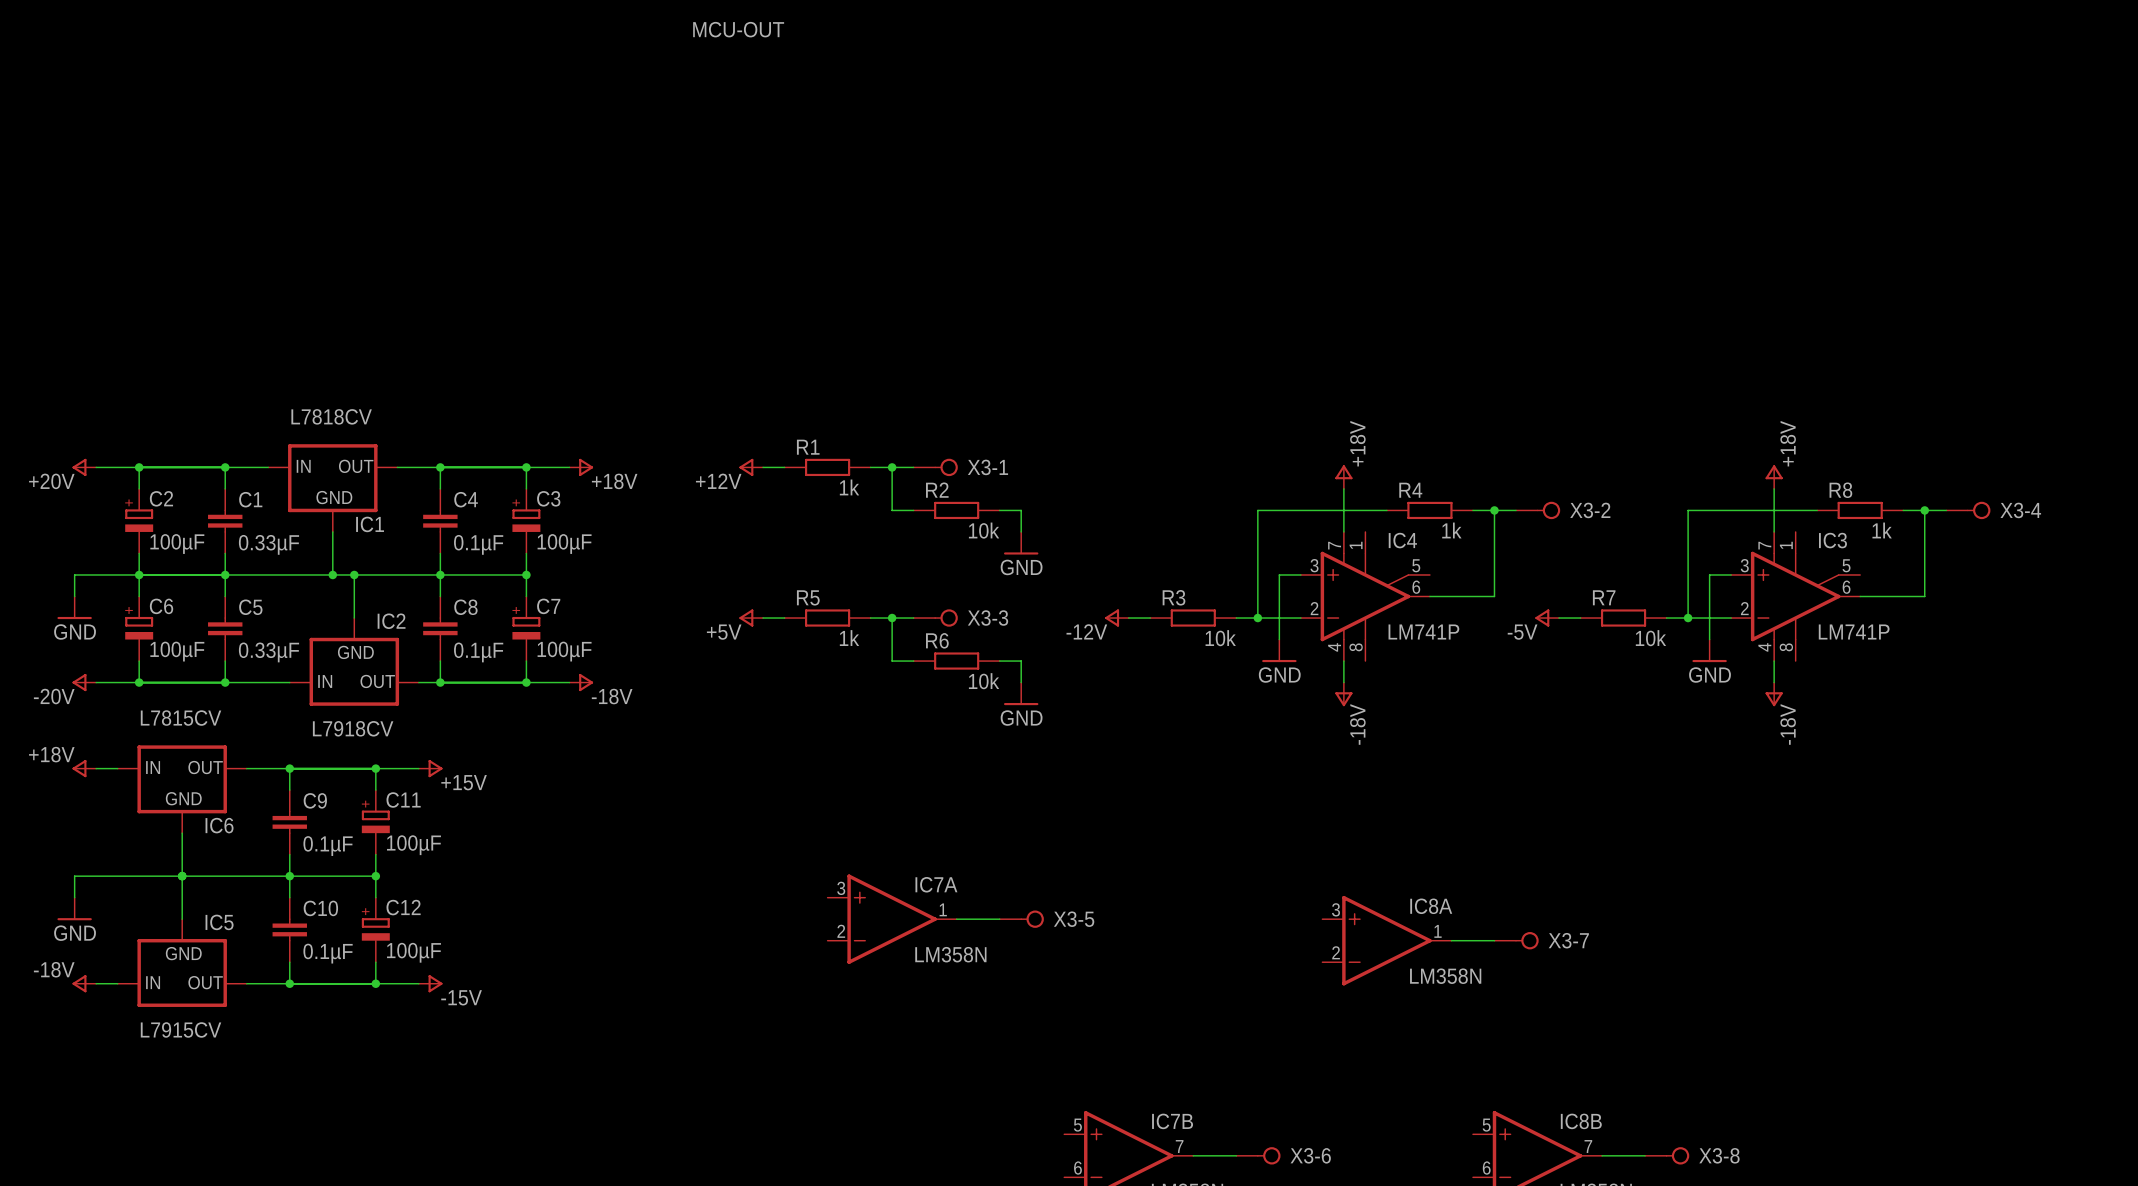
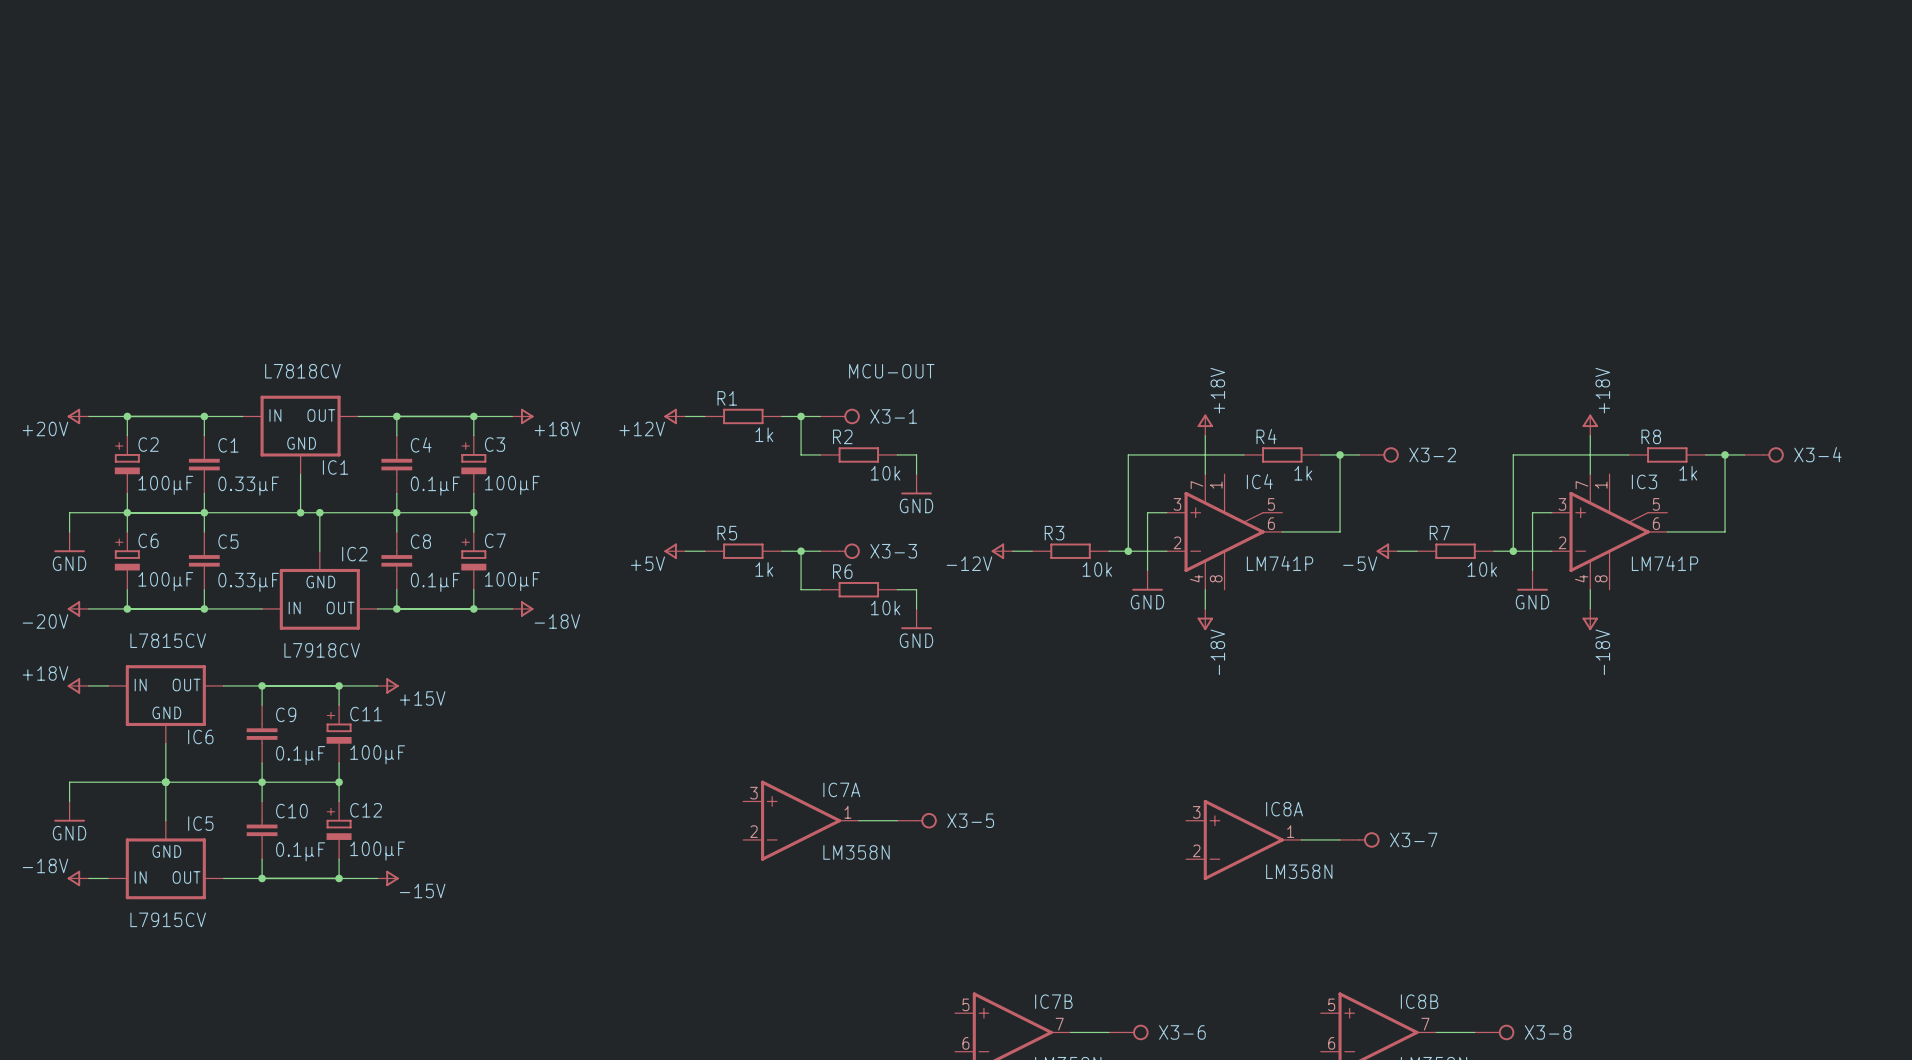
X3-8 value position: MCU-OUT (738, 29) -> MCU-OUT (891, 371)

